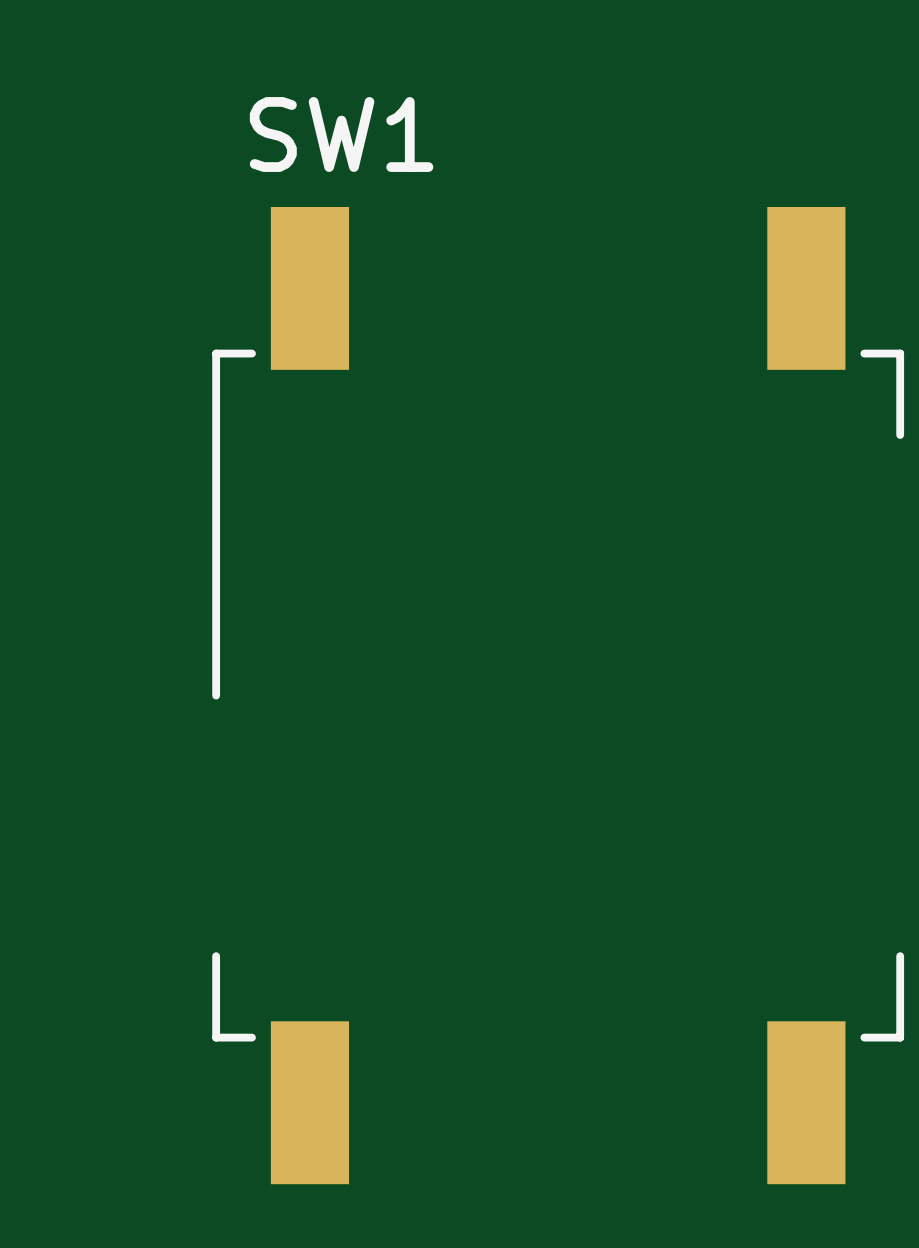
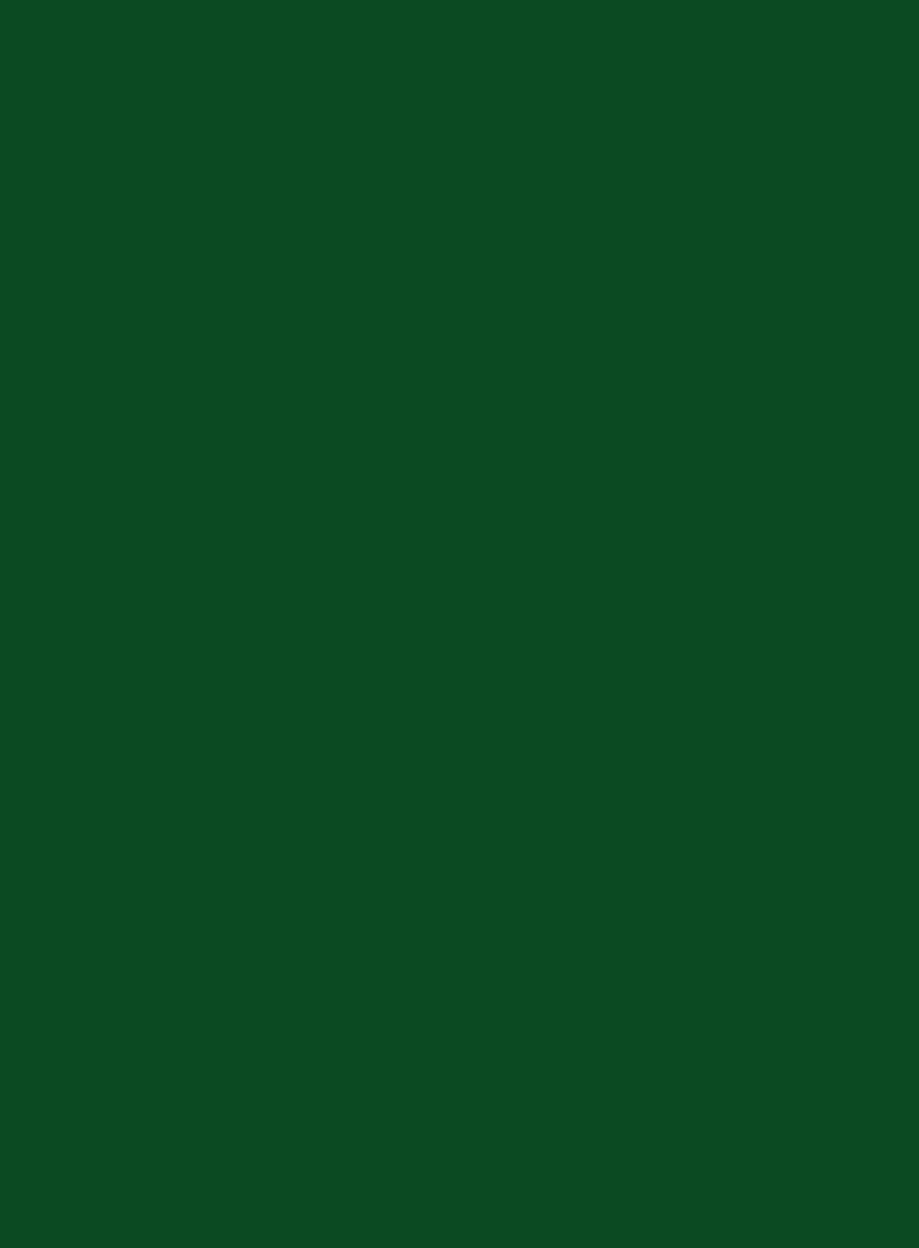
SW1: (558, 695) -> none

